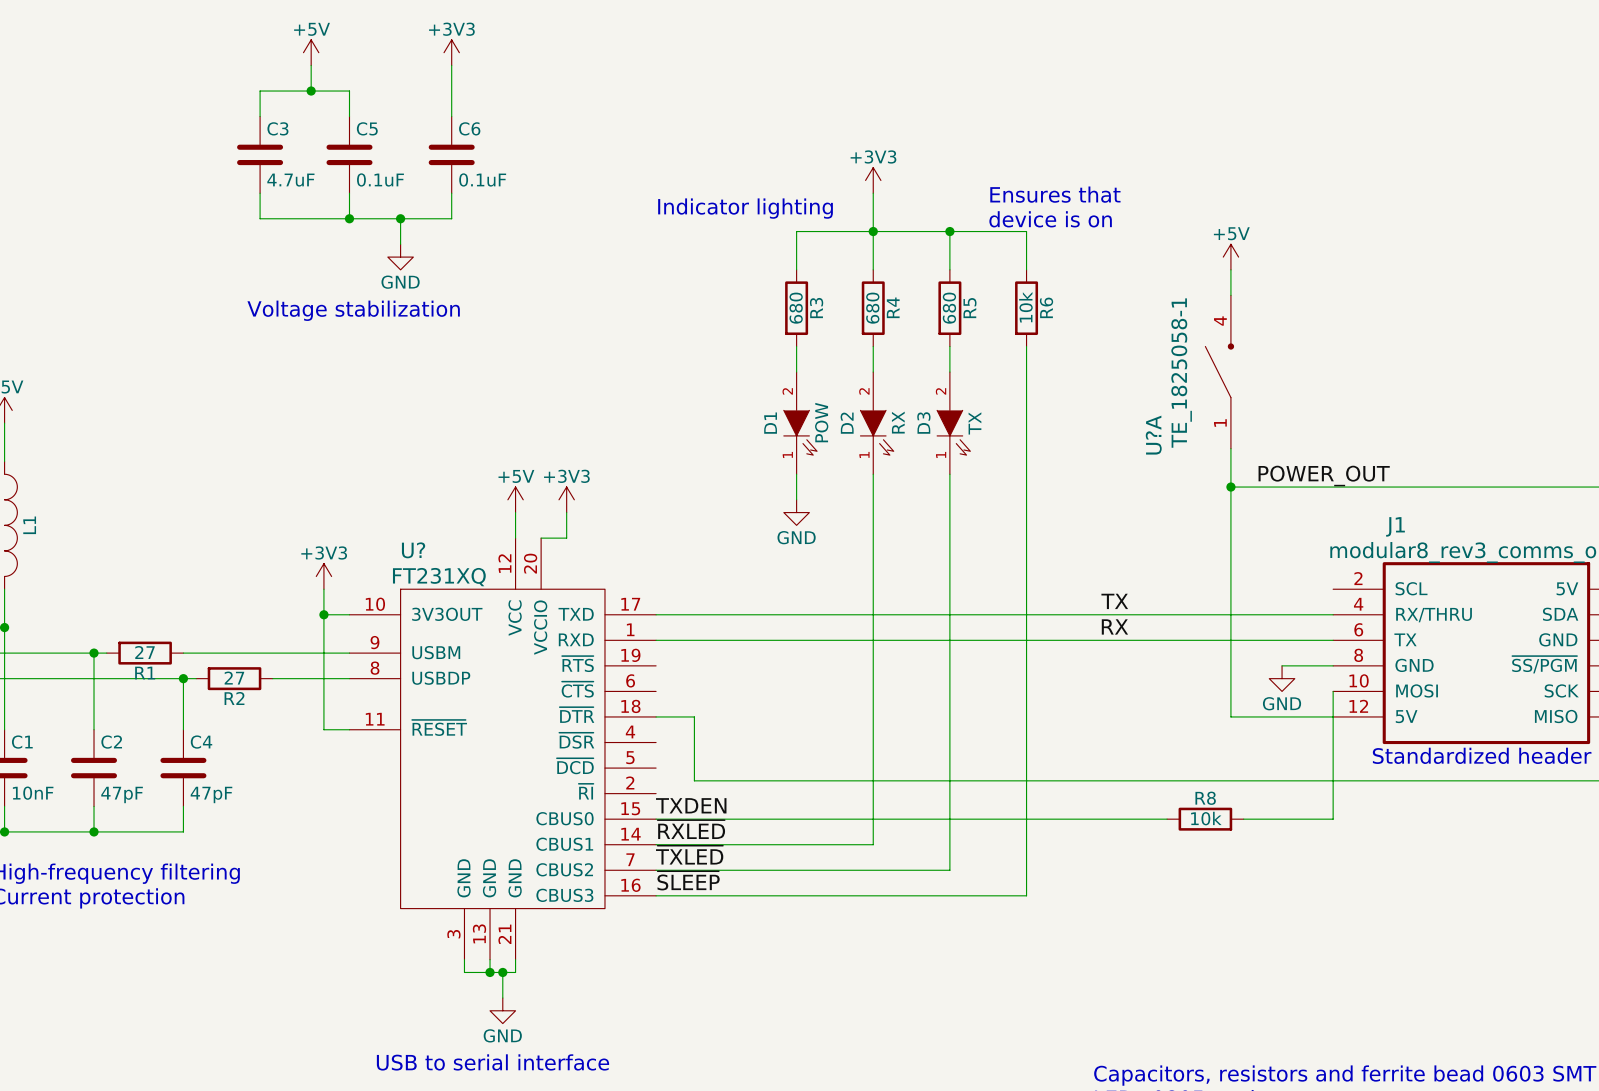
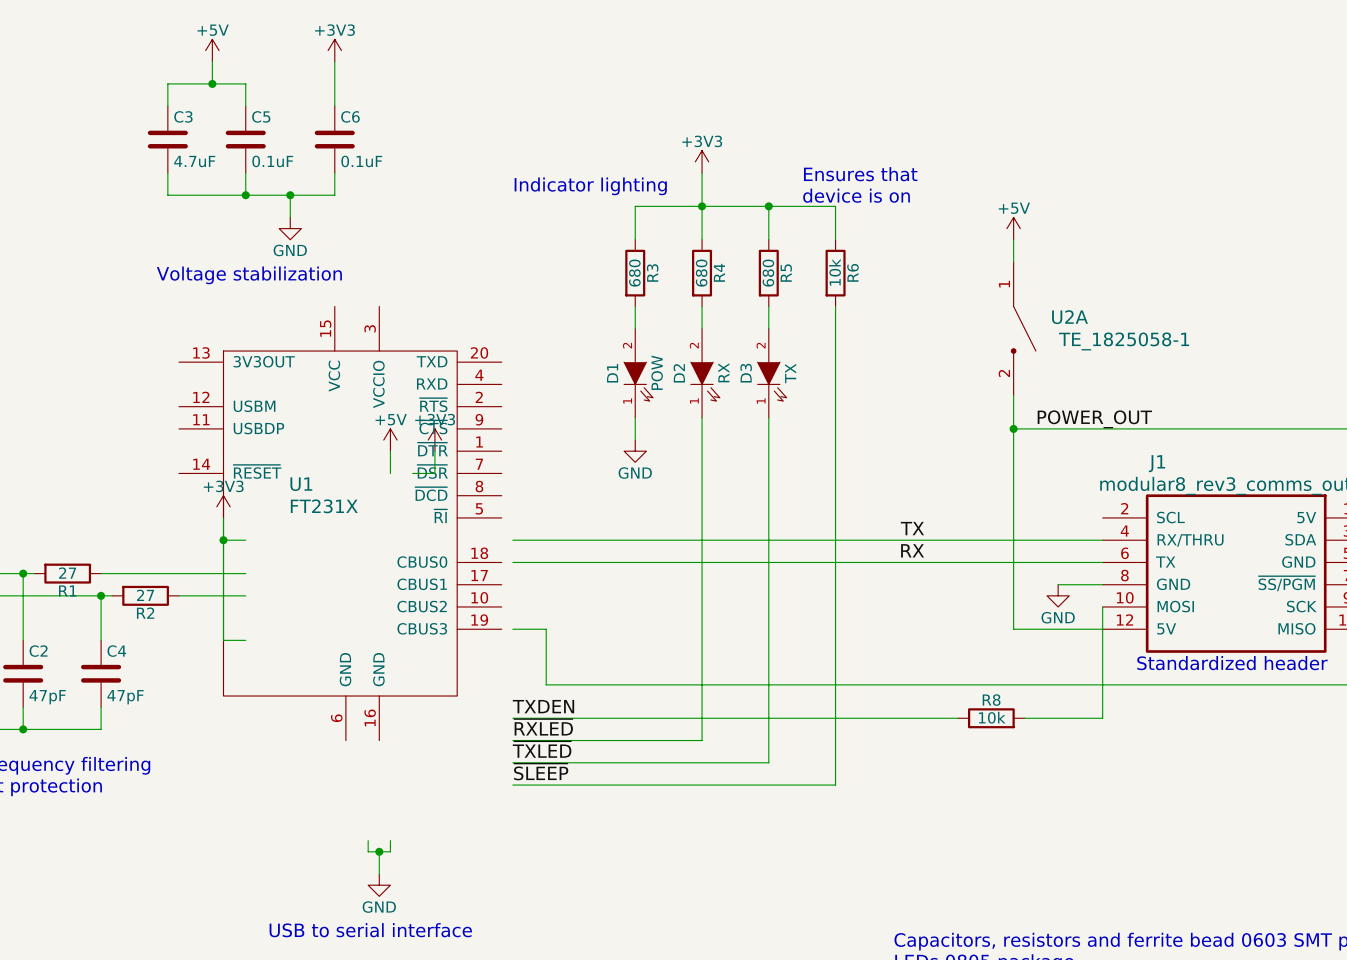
U?A: TE_1825058-1 (1219, 372) -> none
U2A: none -> TE_1825058-1 (1023, 328)
U1: none -> FT231X (340, 523)
U?: FT231XQ (502, 748) -> none
wire: (464, 959) (464, 972) (490, 972) -> none
junction: (490, 972) -> none

